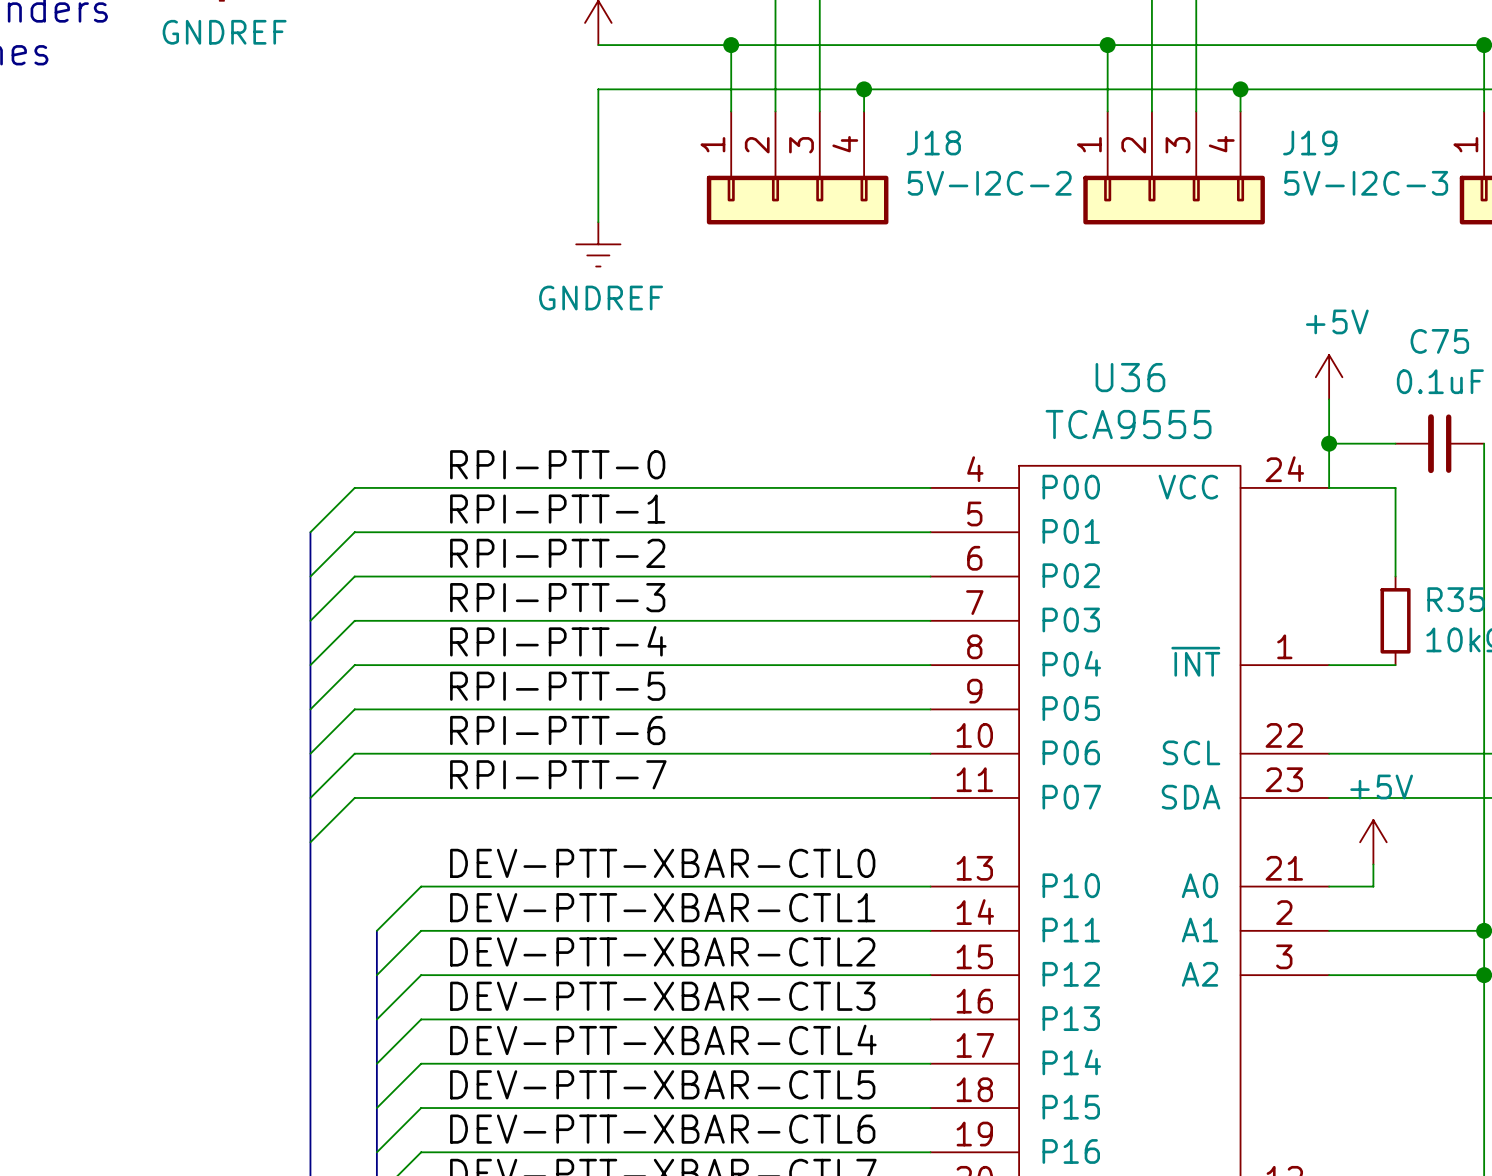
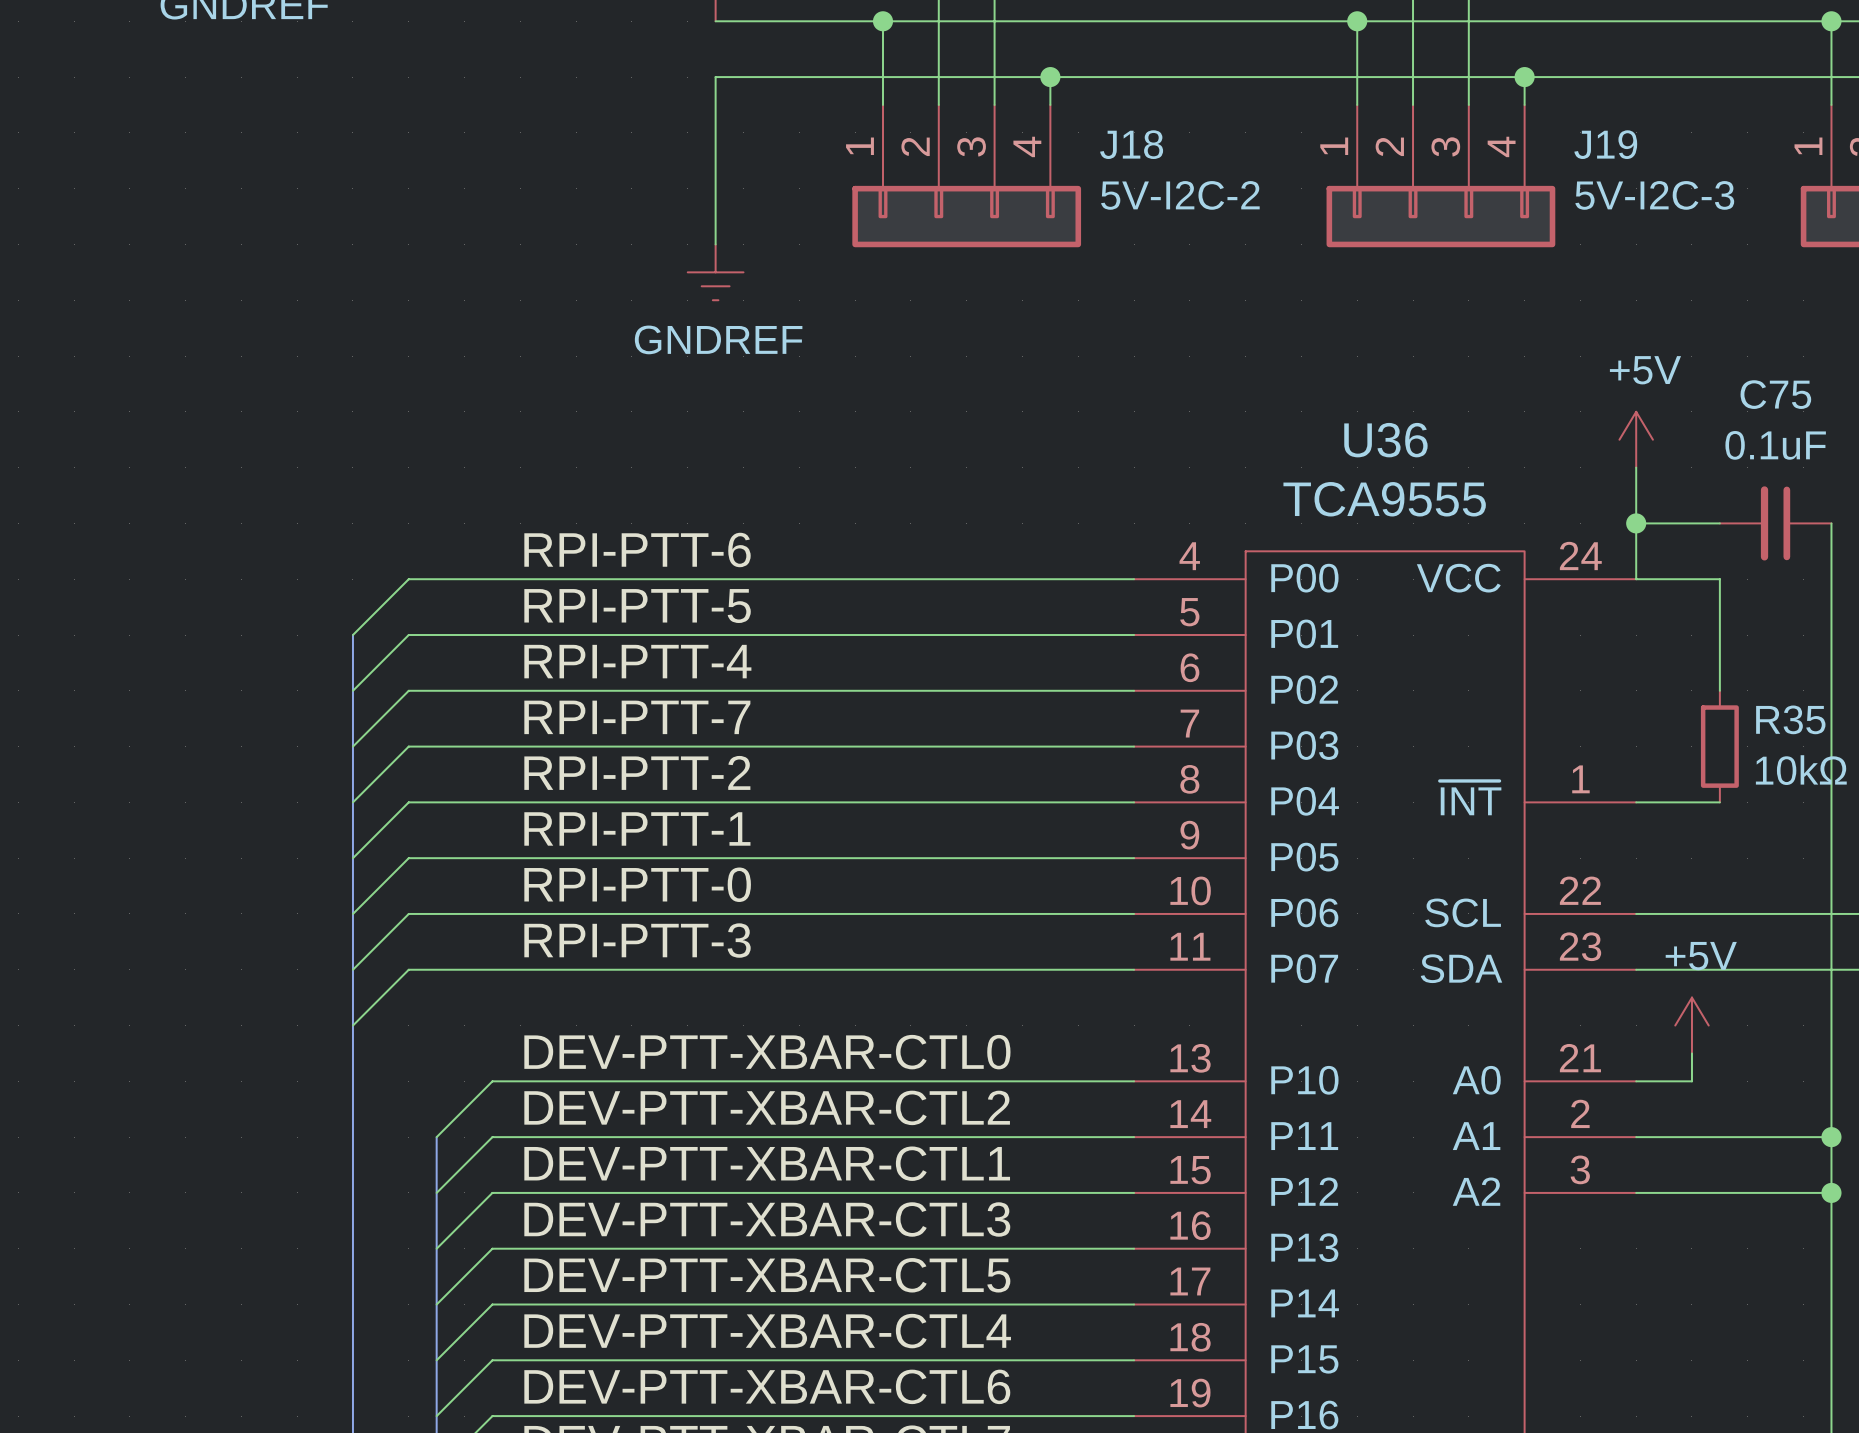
label: RPI-PTT-0 (557, 464) -> RPI-PTT-6 (637, 549)
label: RPI-PTT-1 (557, 509) -> RPI-PTT-5 (637, 606)
label: RPI-PTT-2 (557, 553) -> RPI-PTT-4 (637, 661)
label: RPI-PTT-3 (557, 597) -> RPI-PTT-7 (637, 717)
label: RPI-PTT-4 (558, 641) -> RPI-PTT-2 (637, 772)
label: RPI-PTT-5 (557, 686) -> RPI-PTT-1 (637, 828)
label: RPI-PTT-6 (557, 730) -> RPI-PTT-0 (637, 884)
label: RPI-PTT-7 (558, 774) -> RPI-PTT-3 (637, 940)
label: DEV-PTT-XBAR-CTL1 (662, 907) -> DEV-PTT-XBAR-CTL2 (767, 1107)
label: DEV-PTT-XBAR-CTL2 (662, 951) -> DEV-PTT-XBAR-CTL1 (767, 1163)
label: DEV-PTT-XBAR-CTL4 (663, 1039) -> DEV-PTT-XBAR-CTL5 (767, 1275)
label: DEV-PTT-XBAR-CTL5 (662, 1084) -> DEV-PTT-XBAR-CTL4 (767, 1331)

